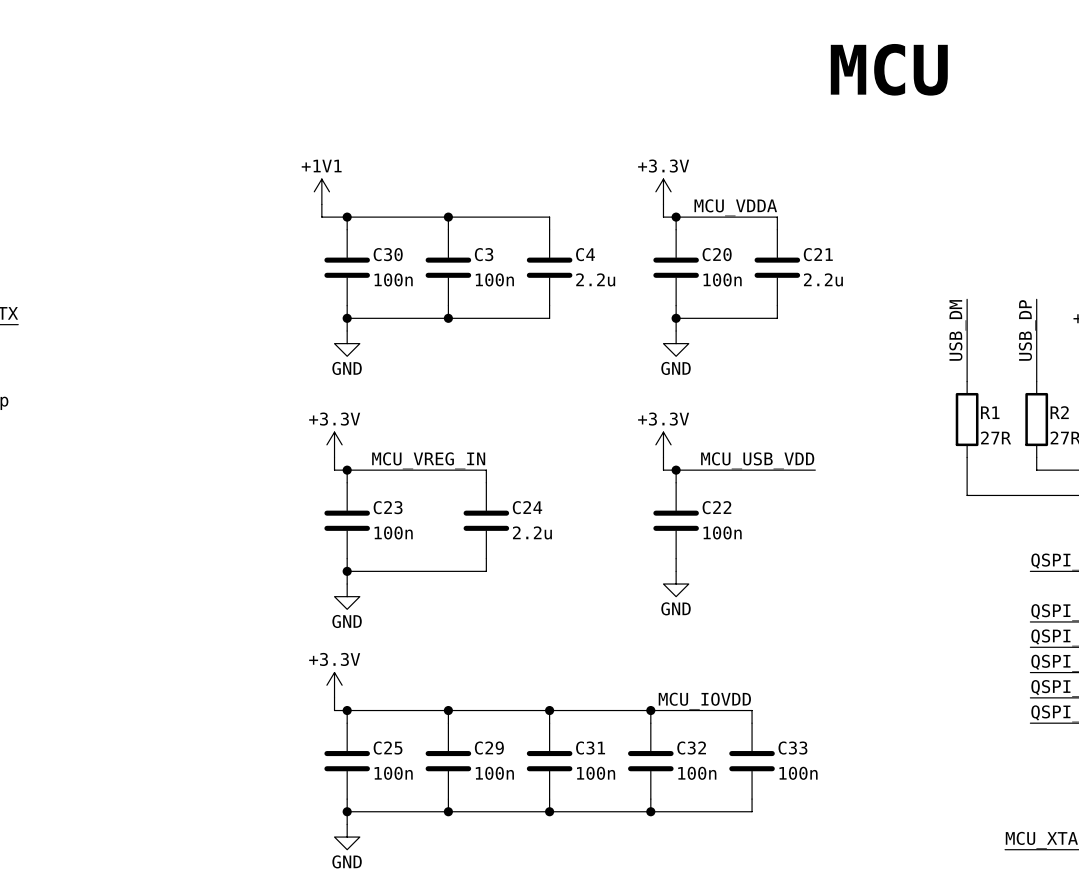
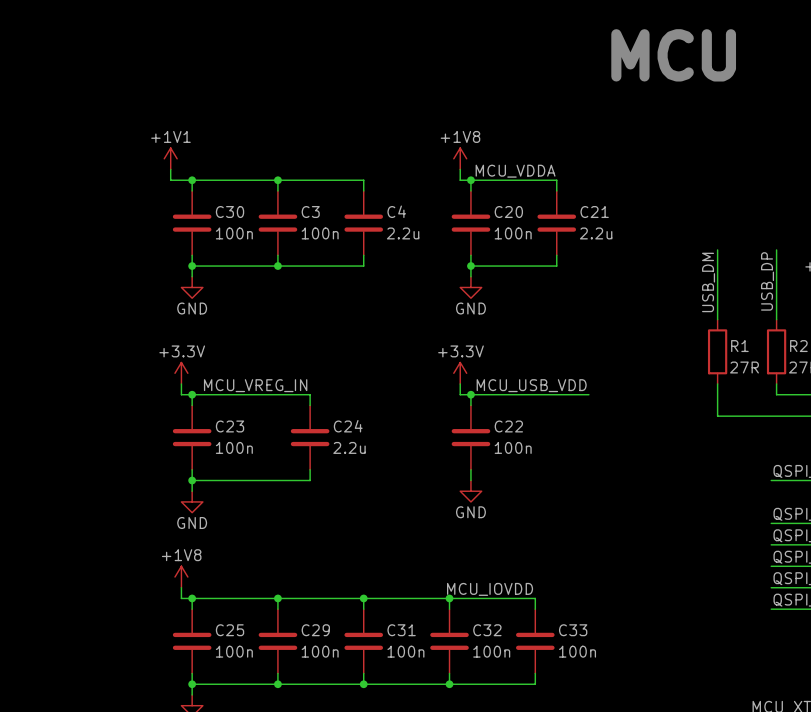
power symbol: +3.3V (663, 191) -> +1V8 (460, 158)
power symbol: +3.3V (334, 685) -> +1V8 (181, 577)

